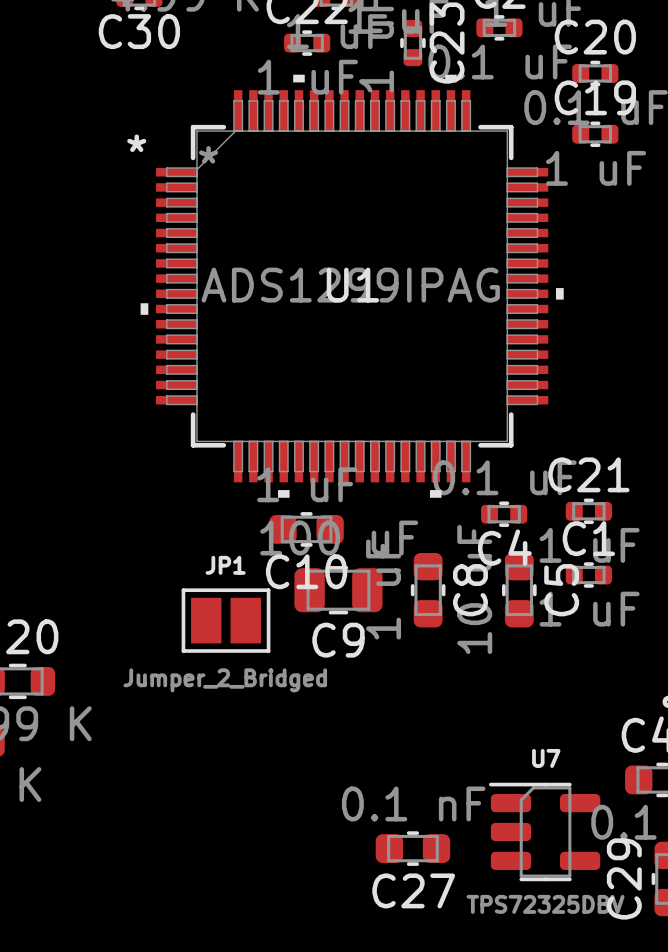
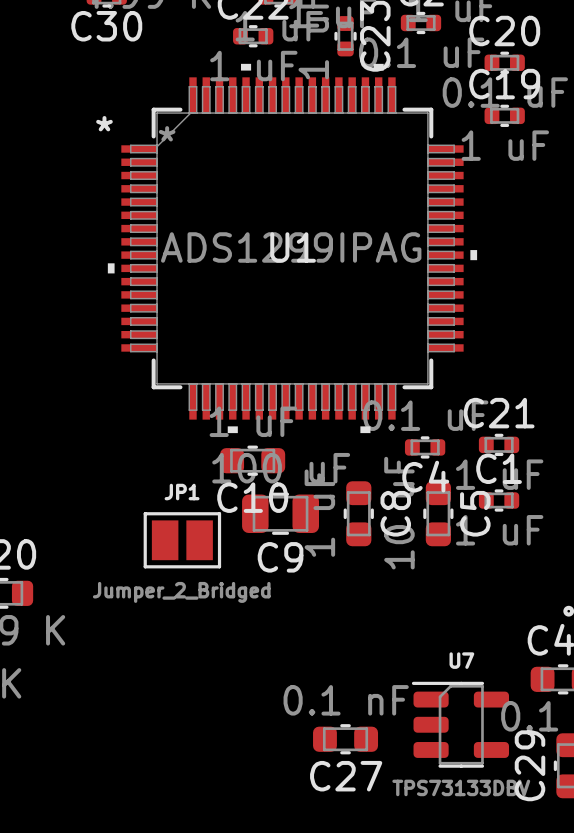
U7 value: TPS72325DBV (545, 904) -> TPS73133DBV (461, 787)

